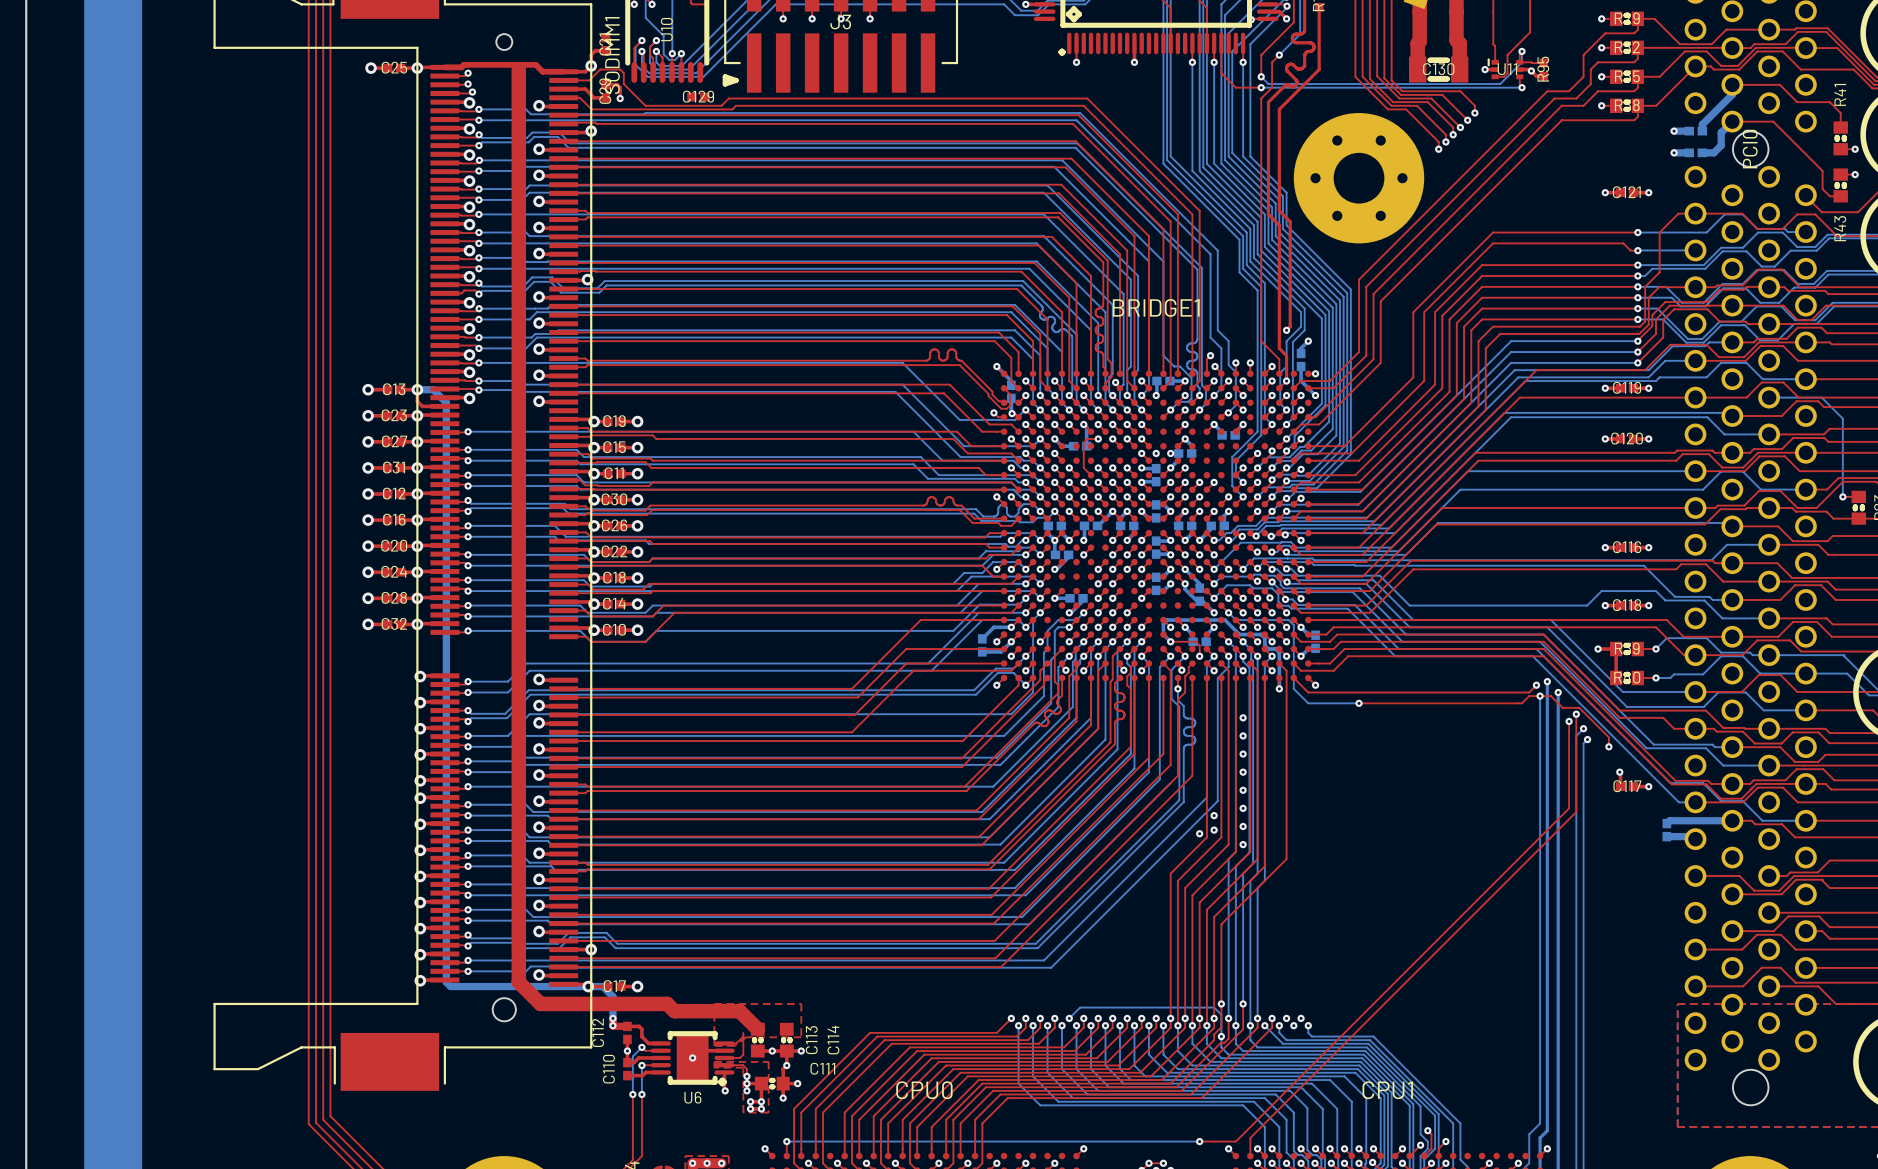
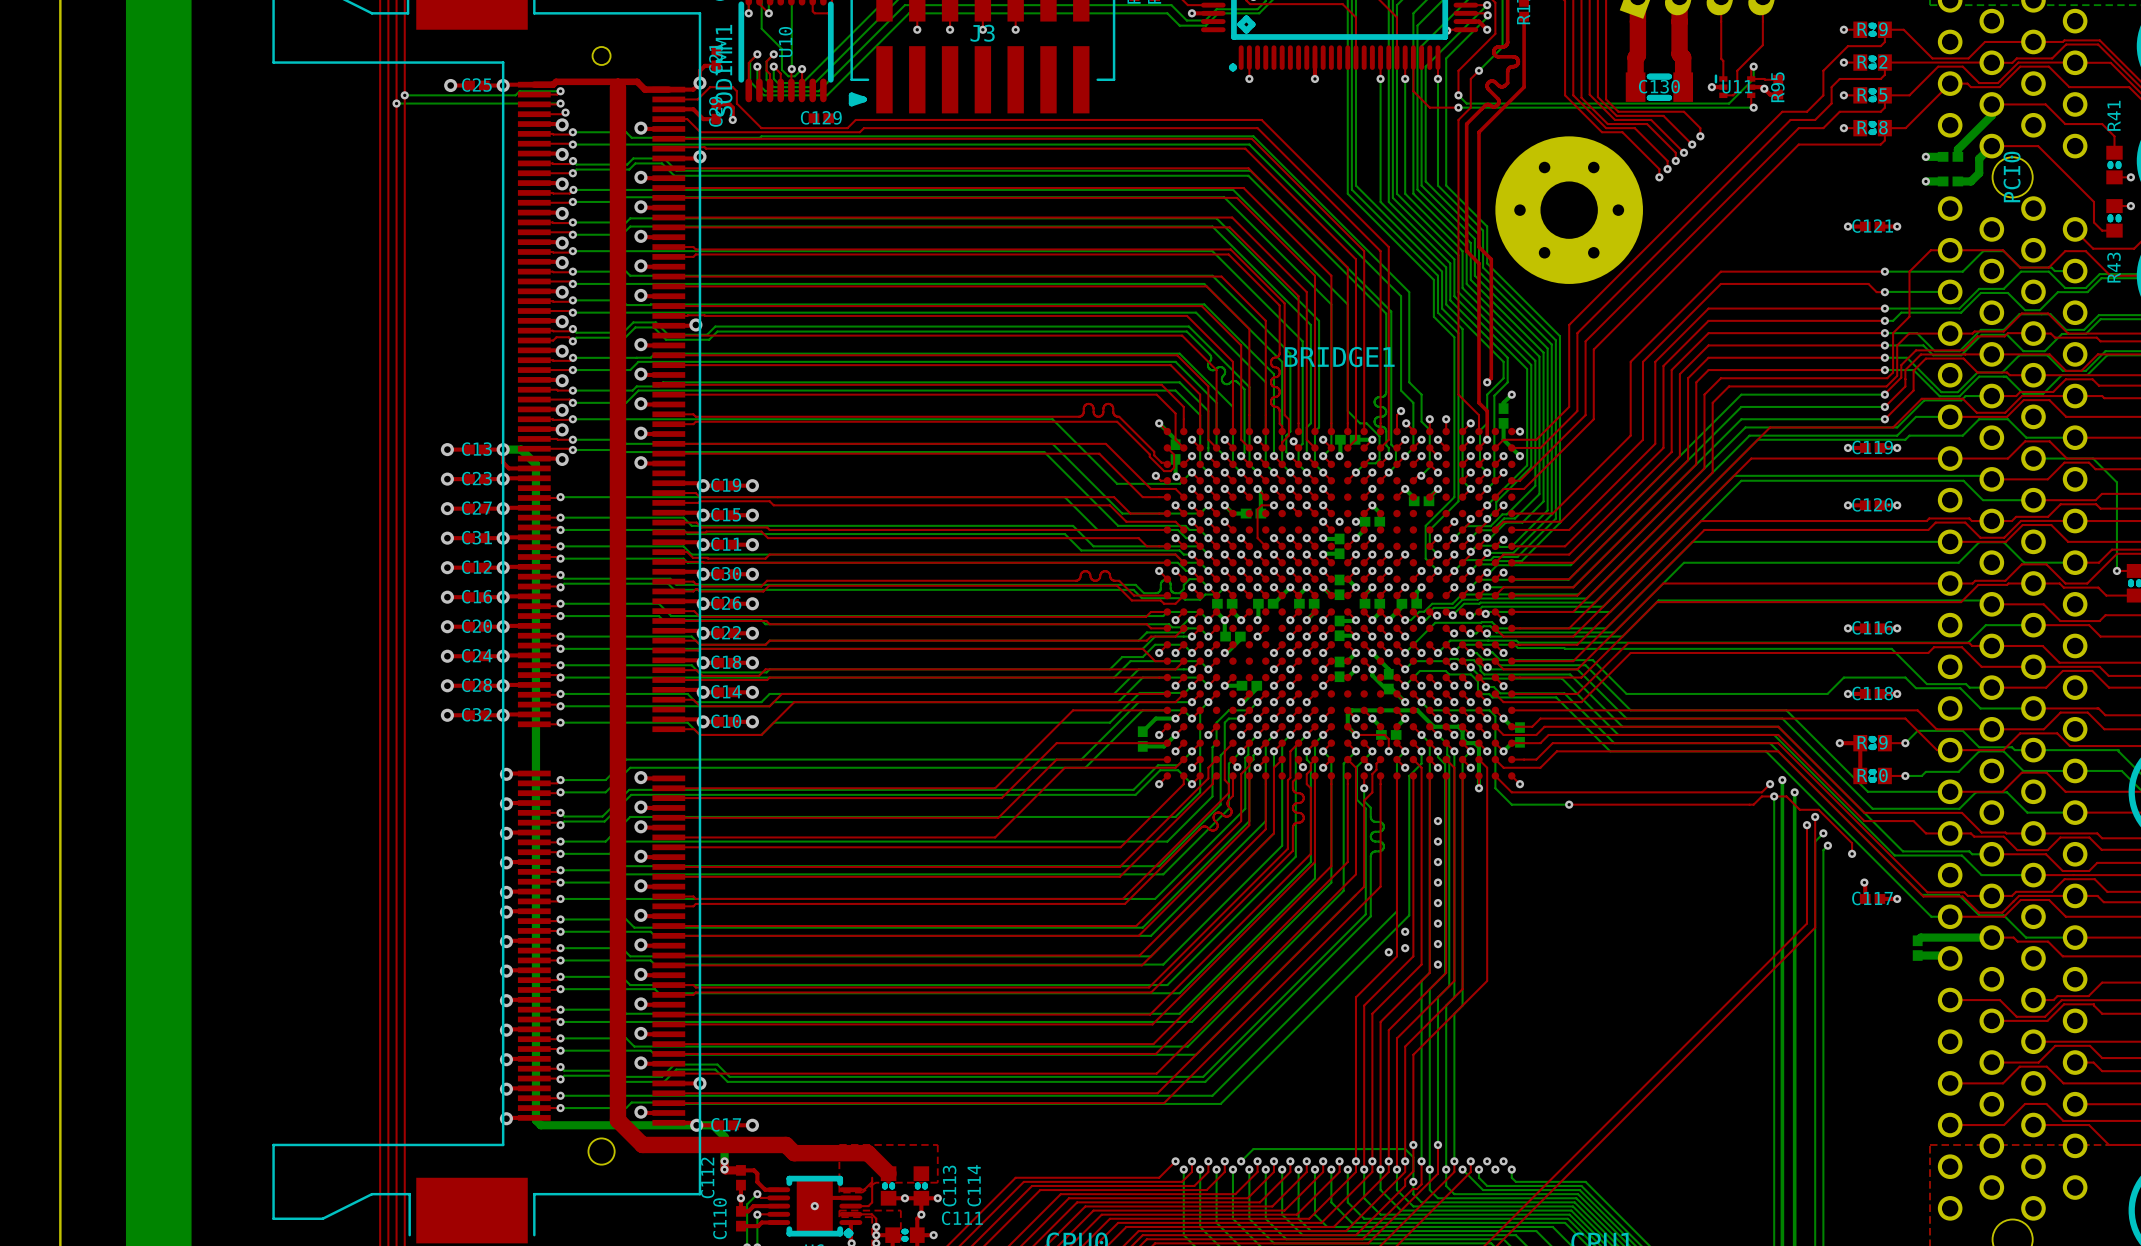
bottom track: none -> (560, 91) (519, 91) (515, 95) (404, 95)
via: none -> (404, 95)
bottom track: none -> (396, 103) (560, 103)
via: none -> (396, 103)

